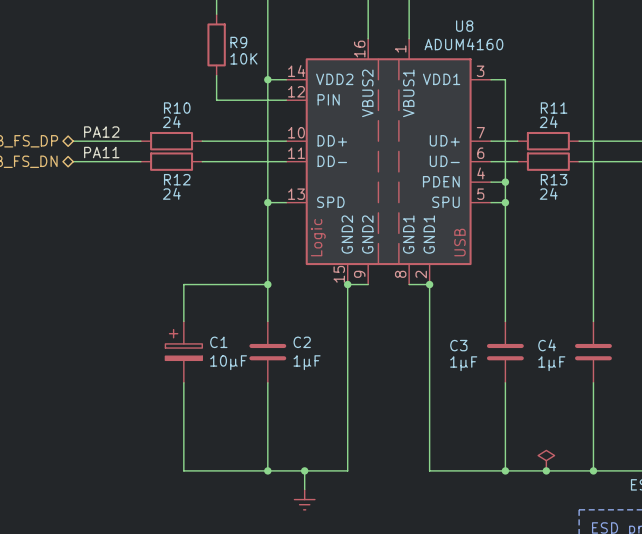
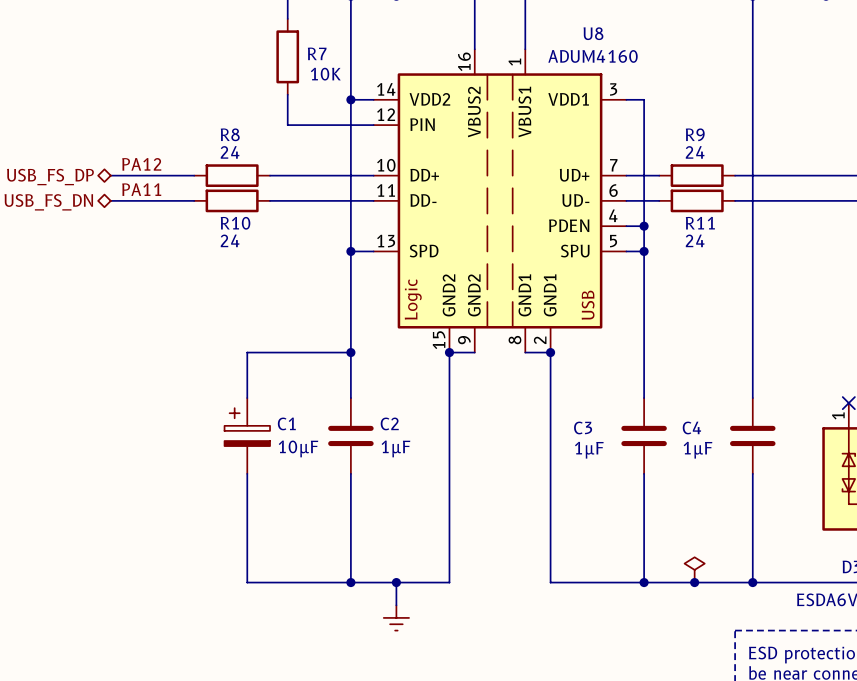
R9 name: R9 (238, 42) -> R7 (317, 53)
R10 name: R10 (177, 108) -> R8 (230, 134)
R11 name: R11 (554, 108) -> R9 (695, 134)
R12 name: R12 (177, 179) -> R10 (235, 223)
R13 name: R13 (554, 179) -> R11 (700, 223)

